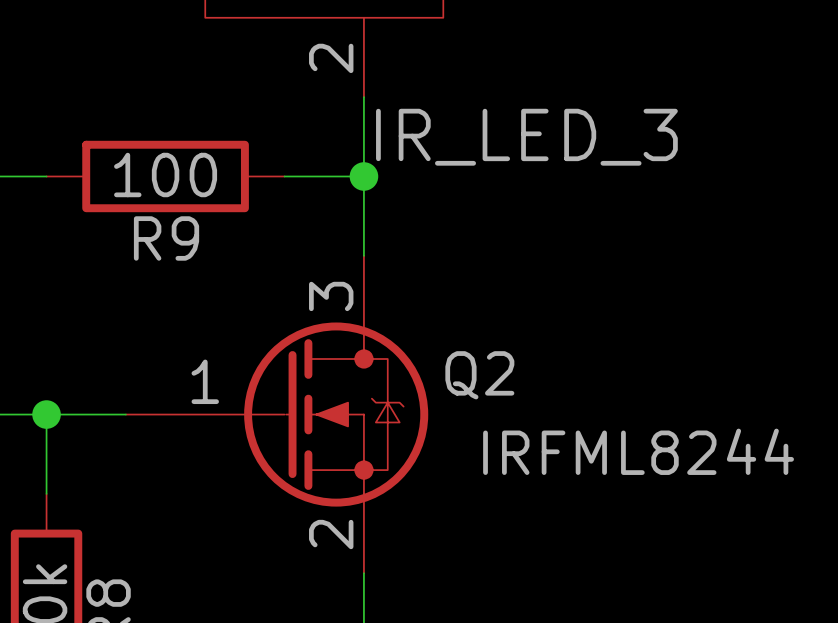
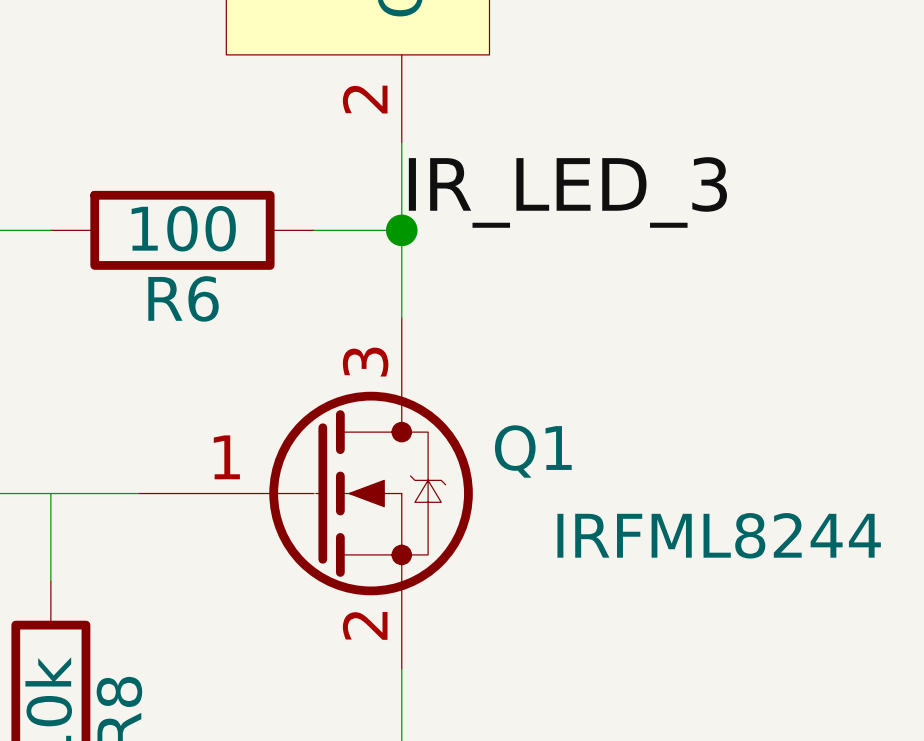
R9 name: R9 (166, 238) -> R6 (183, 298)
Q2 name: Q2 (479, 375) -> Q1 (533, 451)
junction: (46, 414) -> none

